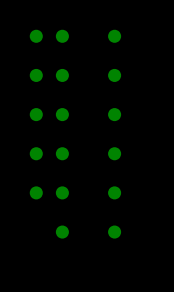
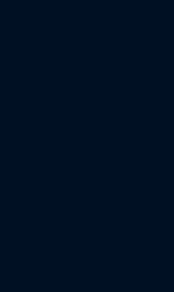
part: (36, 36) -> none
part: (62, 36) -> none
part: (114, 36) -> none
part: (36, 75) -> none
part: (62, 75) -> none
part: (114, 75) -> none
part: (36, 114) -> none
part: (62, 114) -> none
part: (114, 114) -> none
part: (36, 153) -> none
part: (62, 153) -> none
part: (114, 153) -> none
part: (36, 192) -> none
part: (62, 192) -> none
part: (114, 192) -> none
part: (62, 232) -> none
part: (114, 232) -> none

